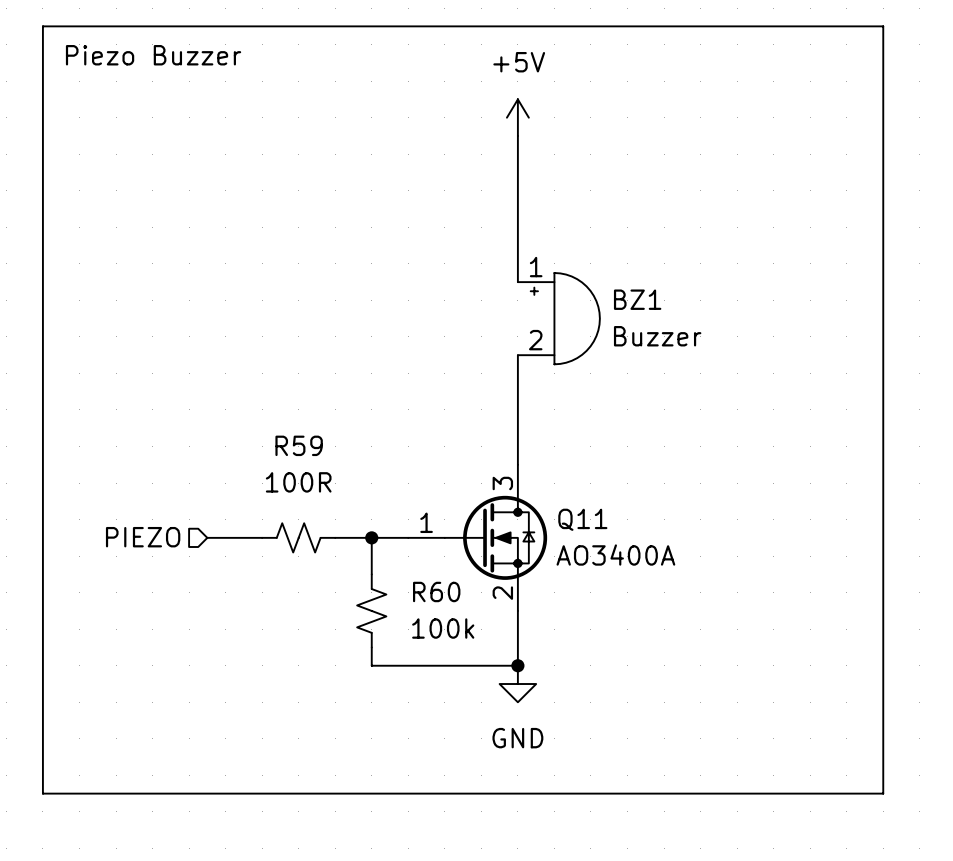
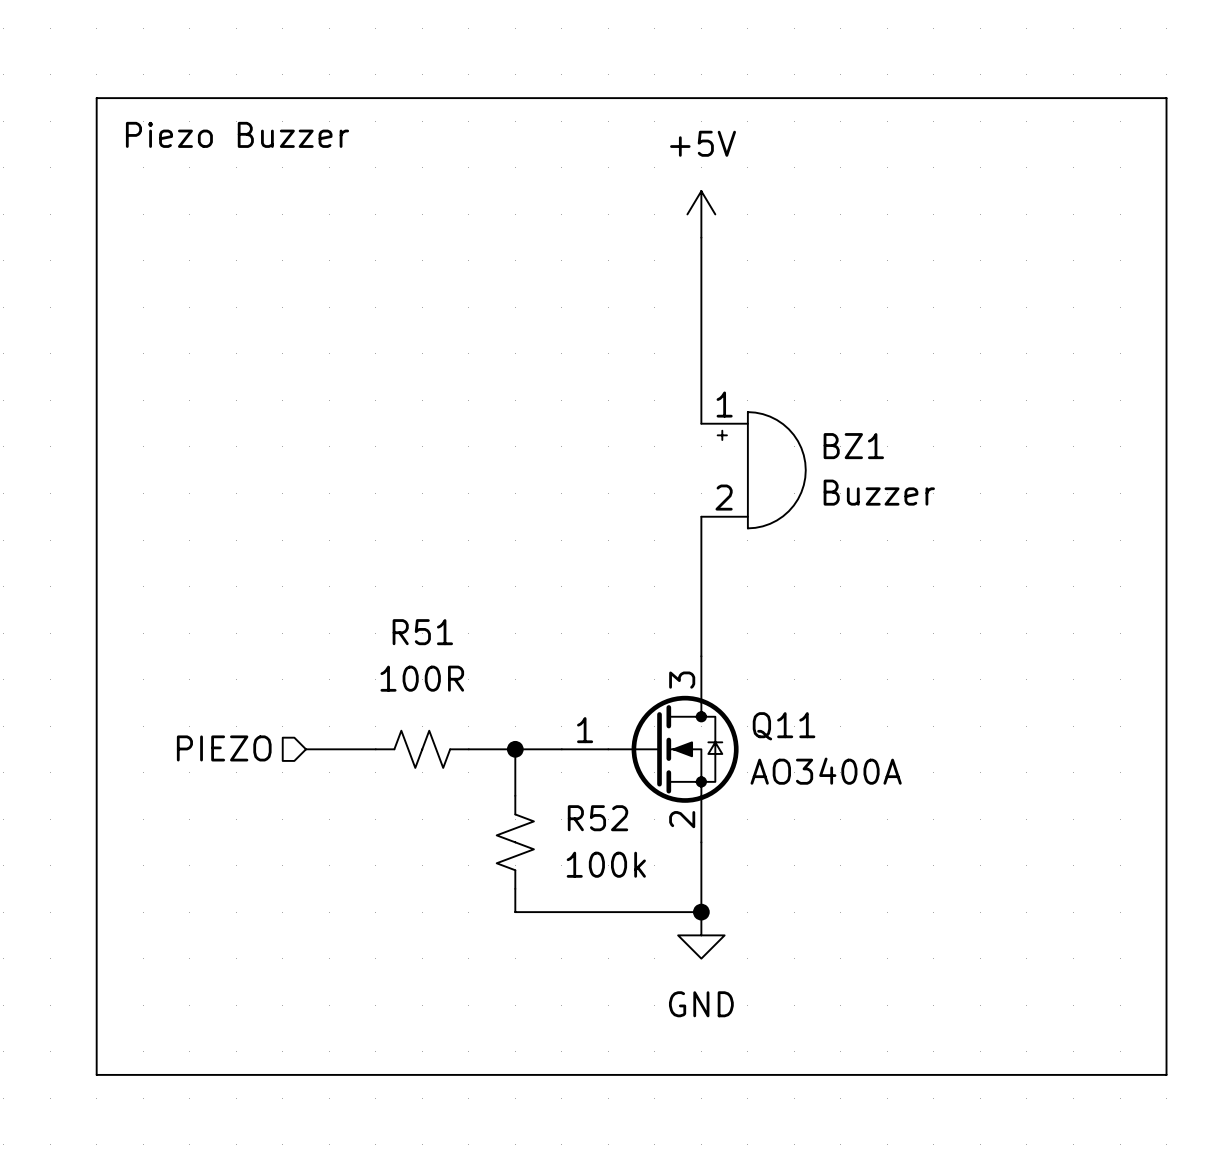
R59 name: R59 (299, 445) -> R51 (422, 632)
R60 name: R60 (436, 591) -> R52 (597, 818)

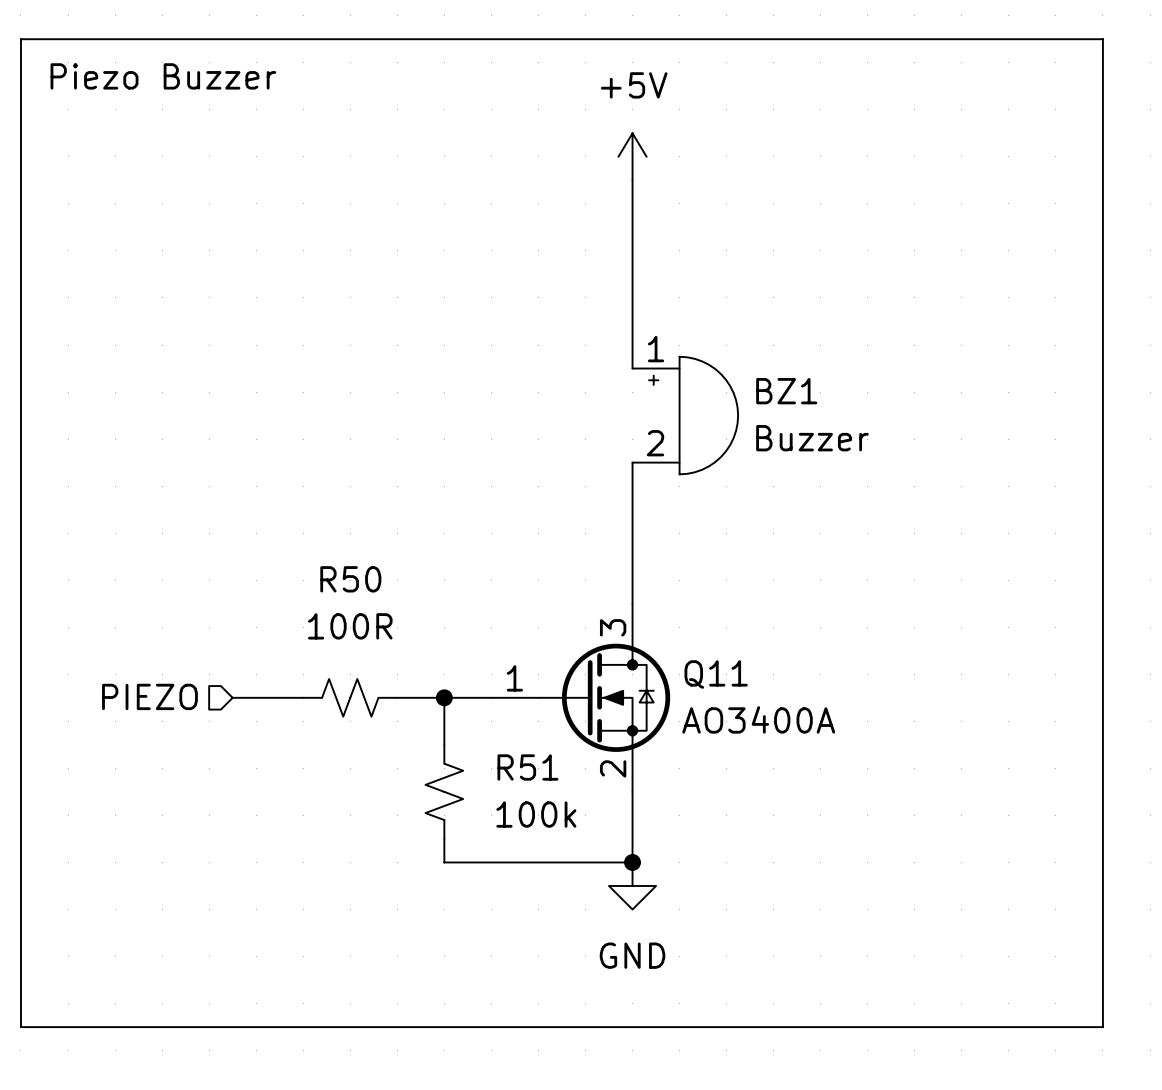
R51 name: R51 (422, 632) -> R50 (350, 579)
R52 name: R52 (597, 818) -> R51 (527, 767)

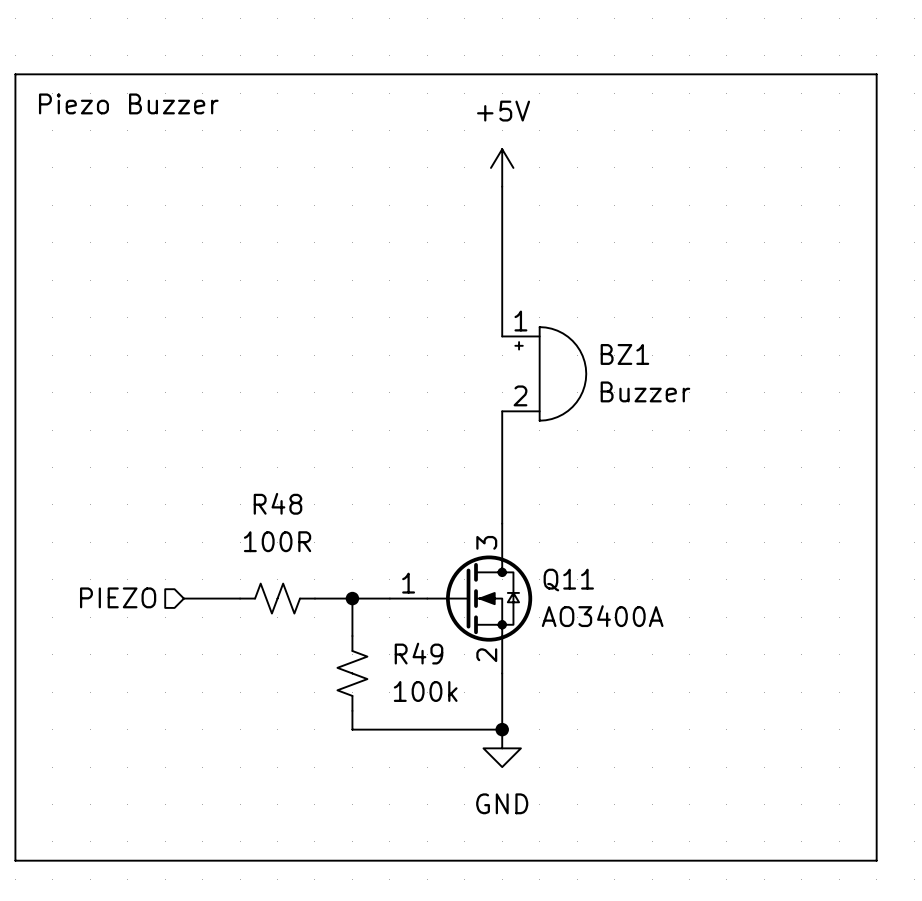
R50 name: R50 (350, 579) -> R48 (277, 503)
R51 name: R51 (527, 767) -> R49 (418, 653)

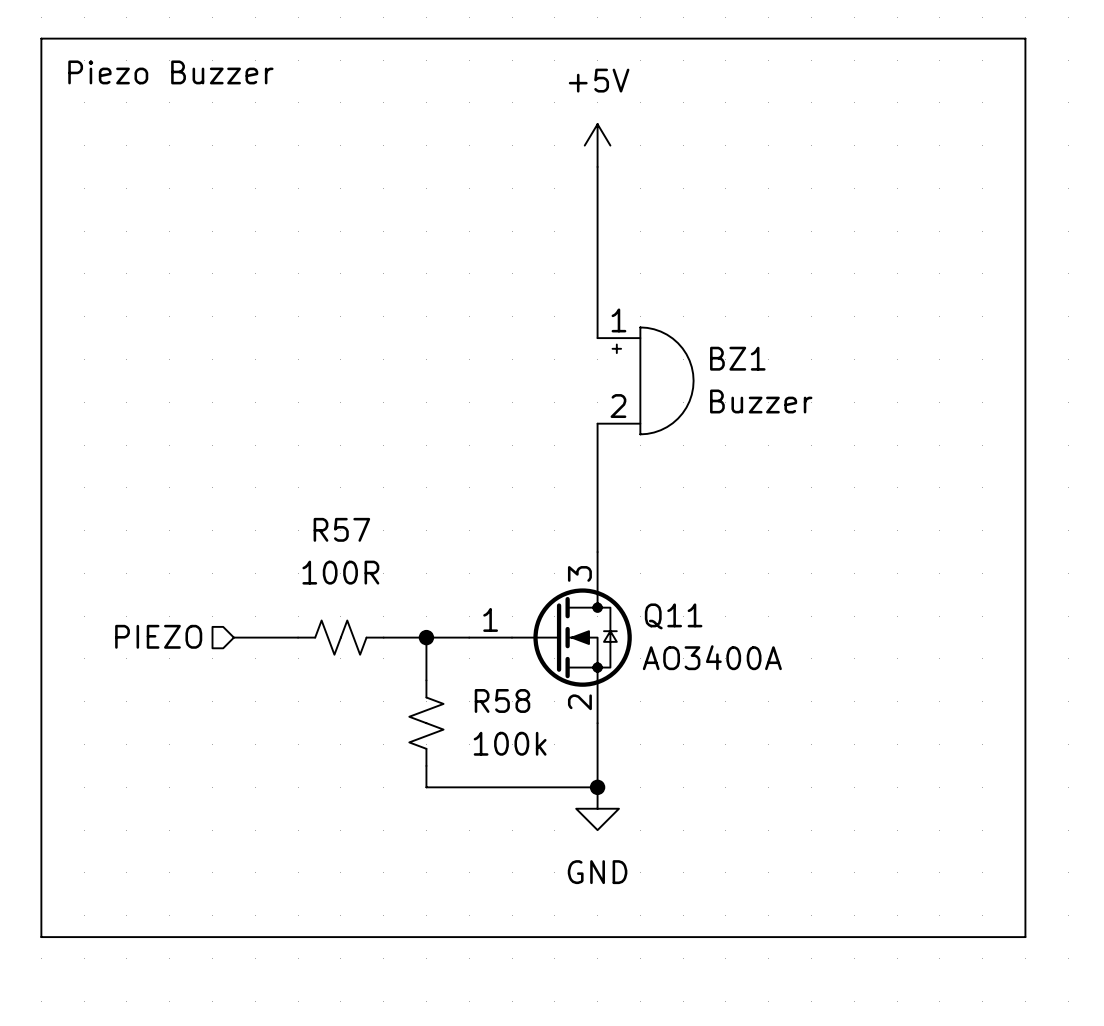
R48 name: R48 (277, 503) -> R57 (341, 529)
R49 name: R49 (418, 653) -> R58 (502, 700)

